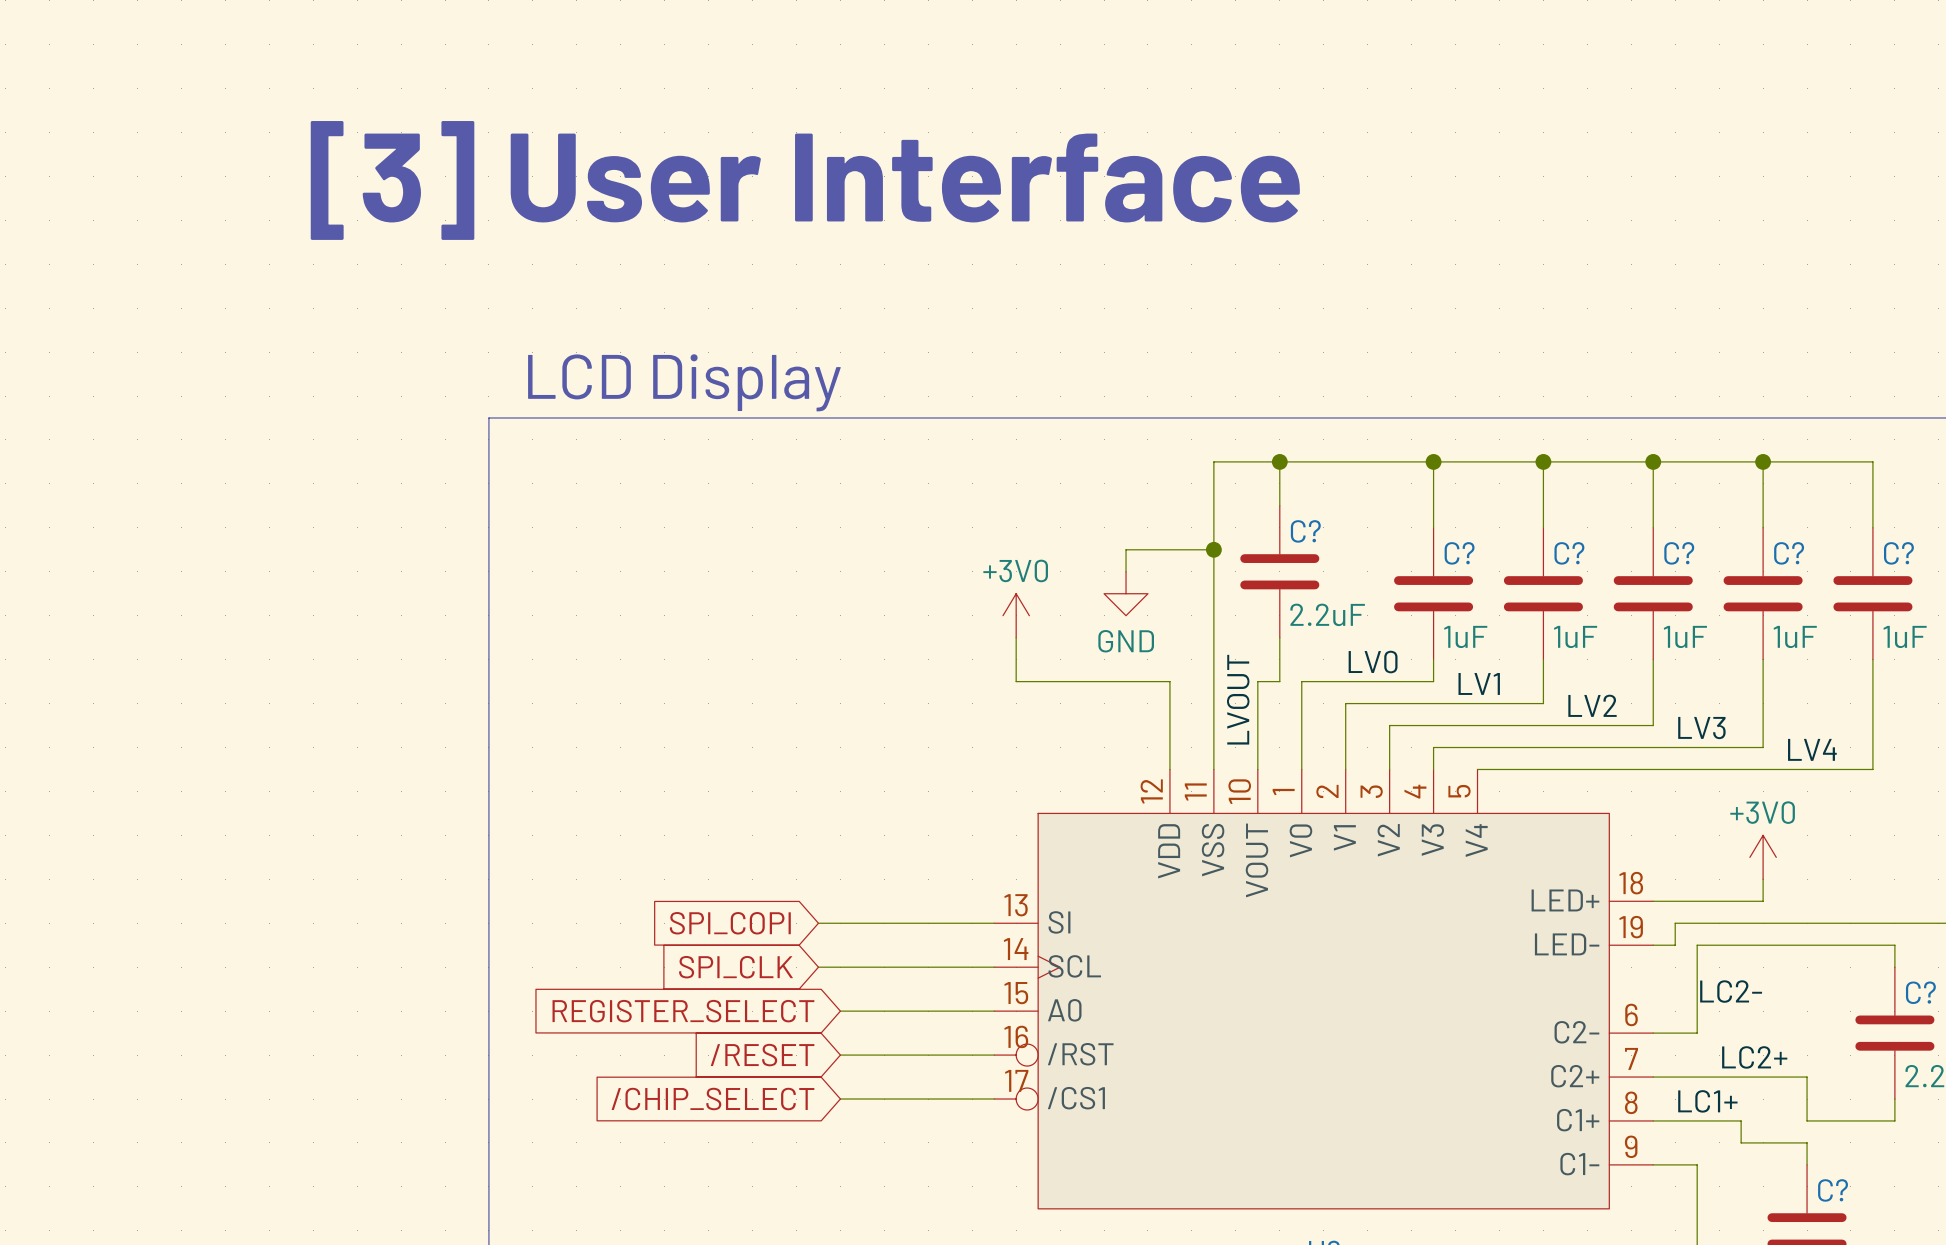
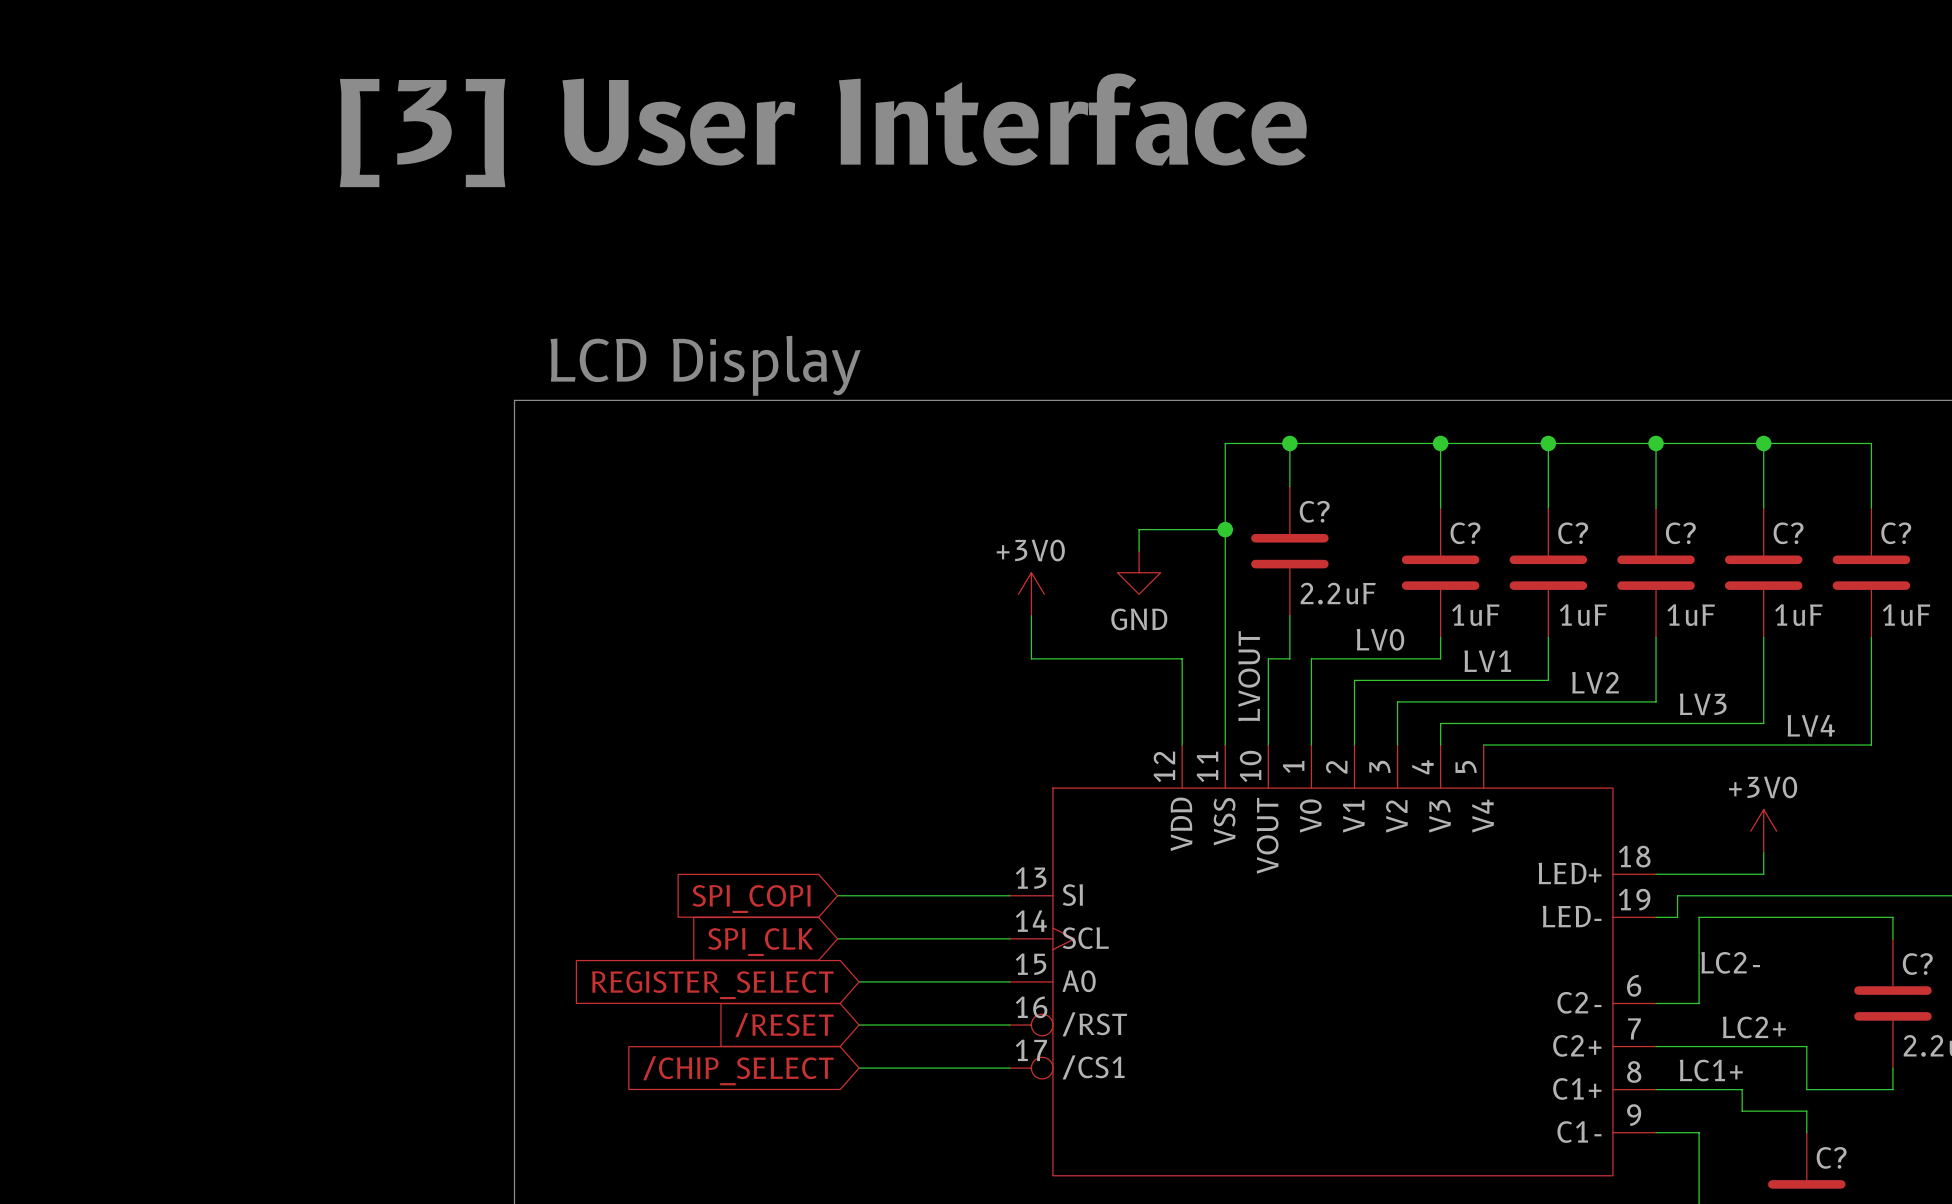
text position: [3] User Interface (805, 180) -> [3] User Interface (823, 130)

